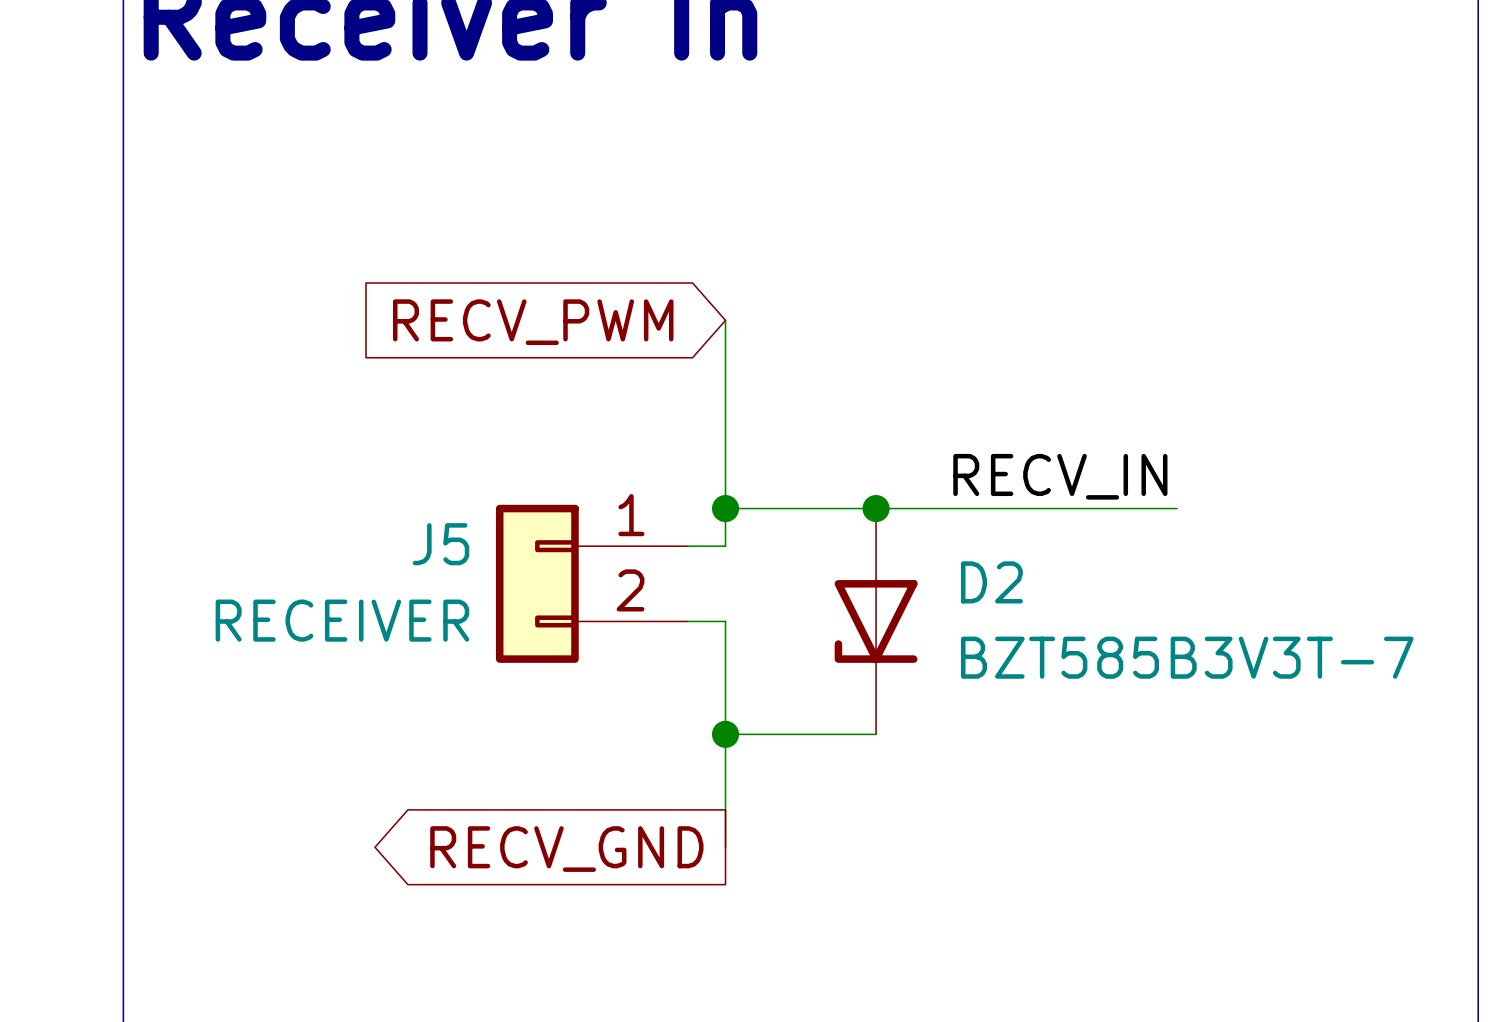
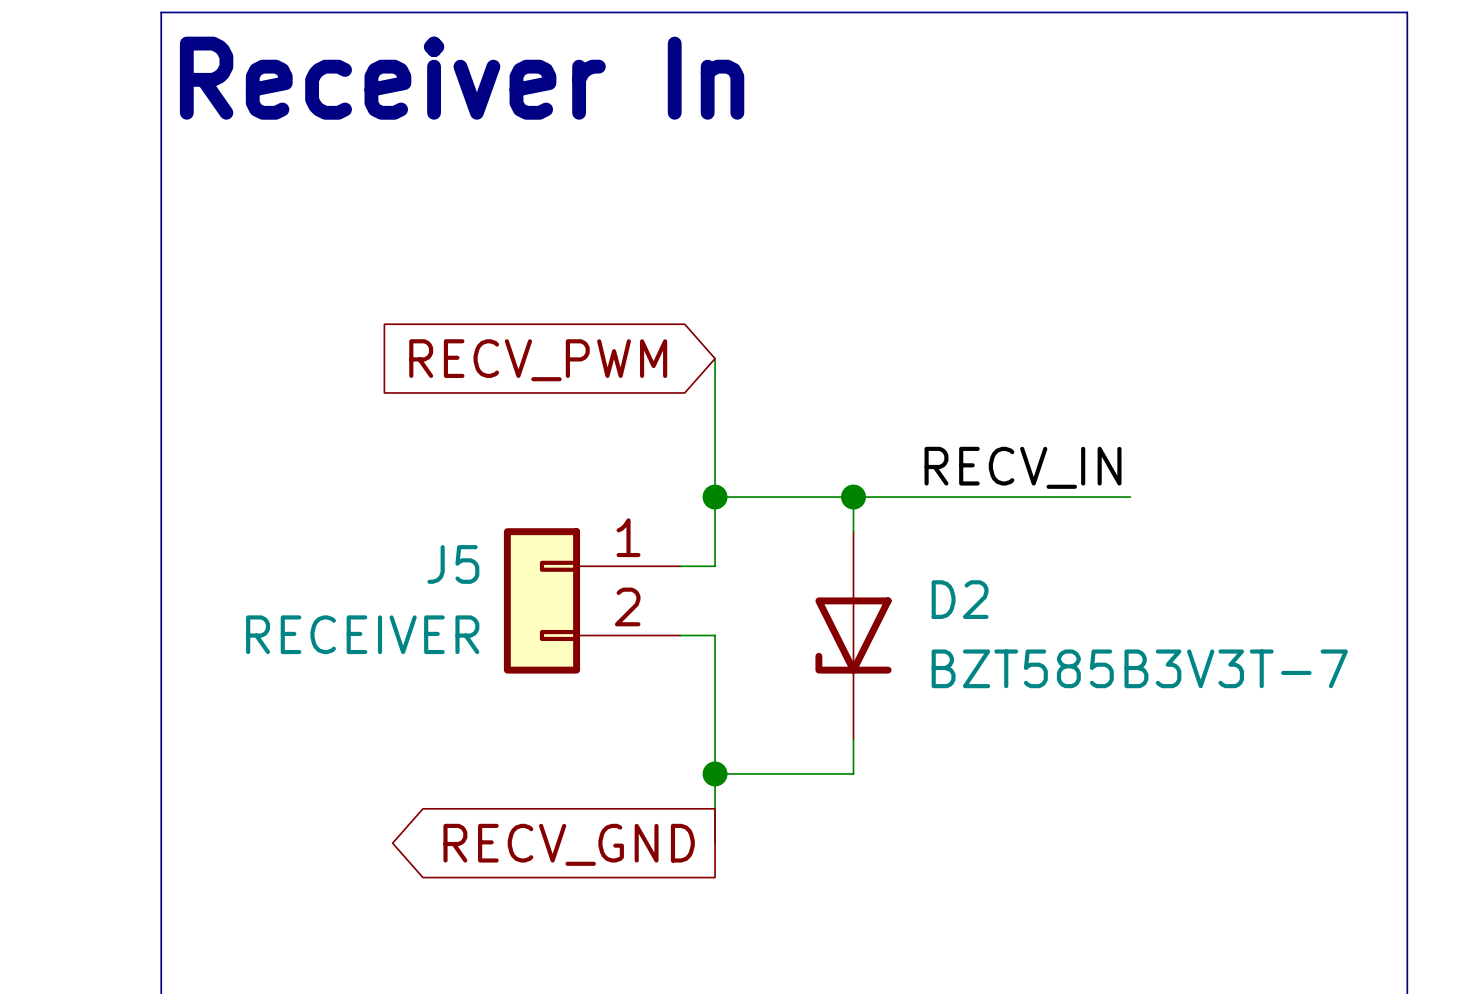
wire: none -> (853, 497) (853, 531)
label position: RECV_IN (1060, 476) -> RECV_IN (1023, 467)
wire: (725, 508) (1177, 508) -> (715, 497) (1130, 497)
junction position: (725, 508) -> (715, 497)
junction position: (876, 508) -> (853, 497)
wire: (725, 734) (876, 734) -> (715, 773) (853, 773) (853, 739)
junction position: (725, 734) -> (715, 773)

